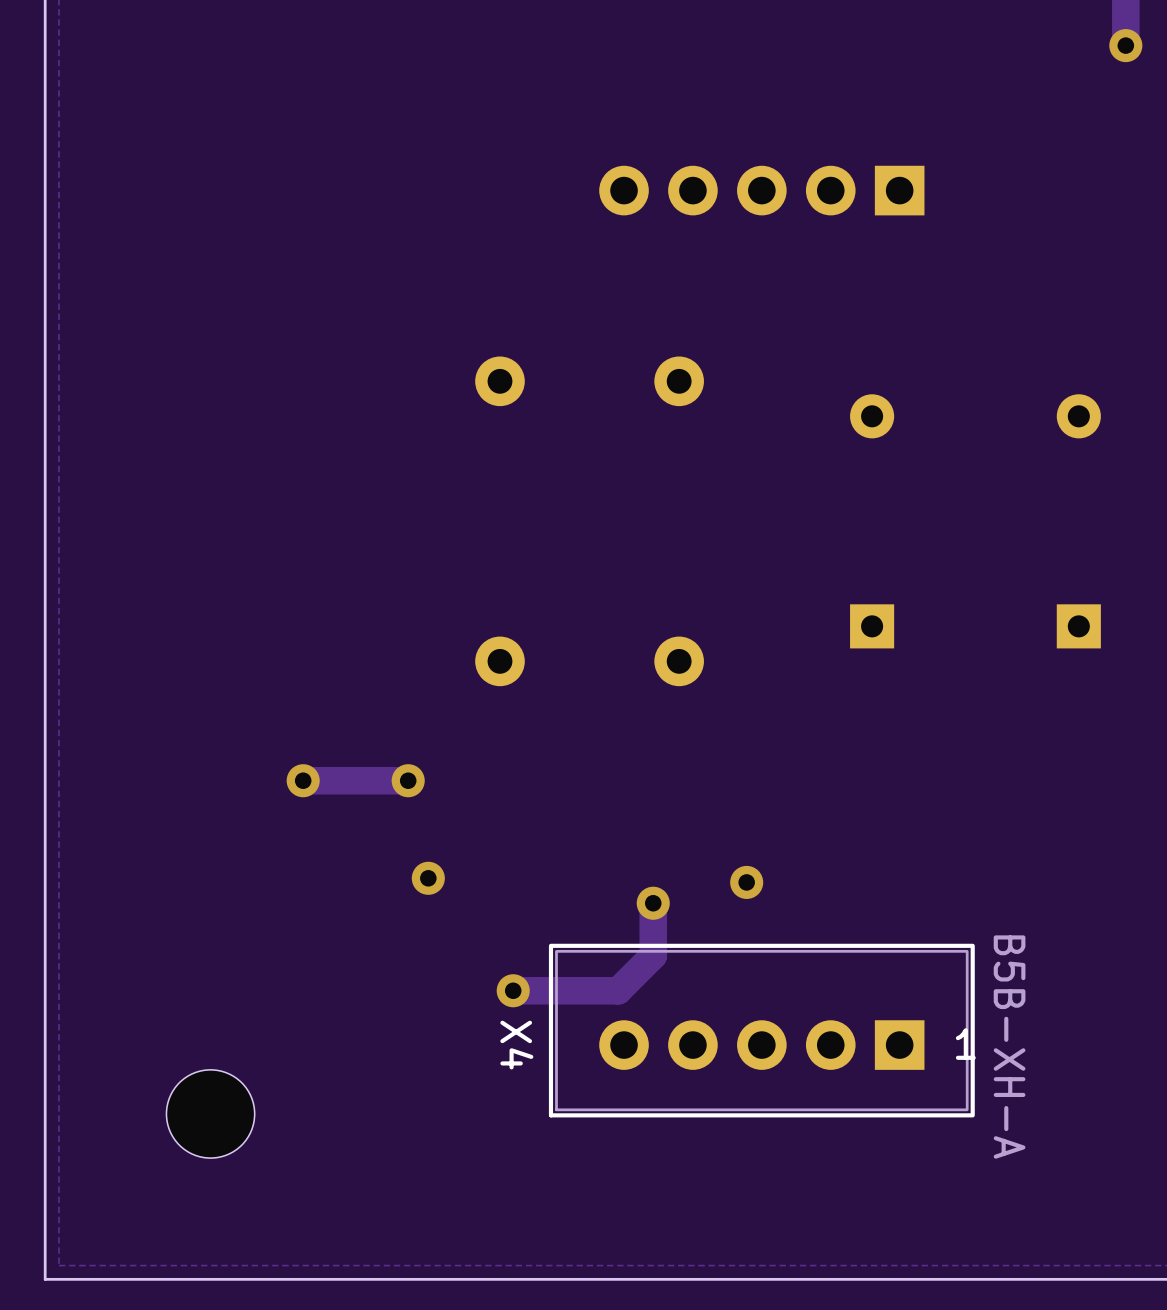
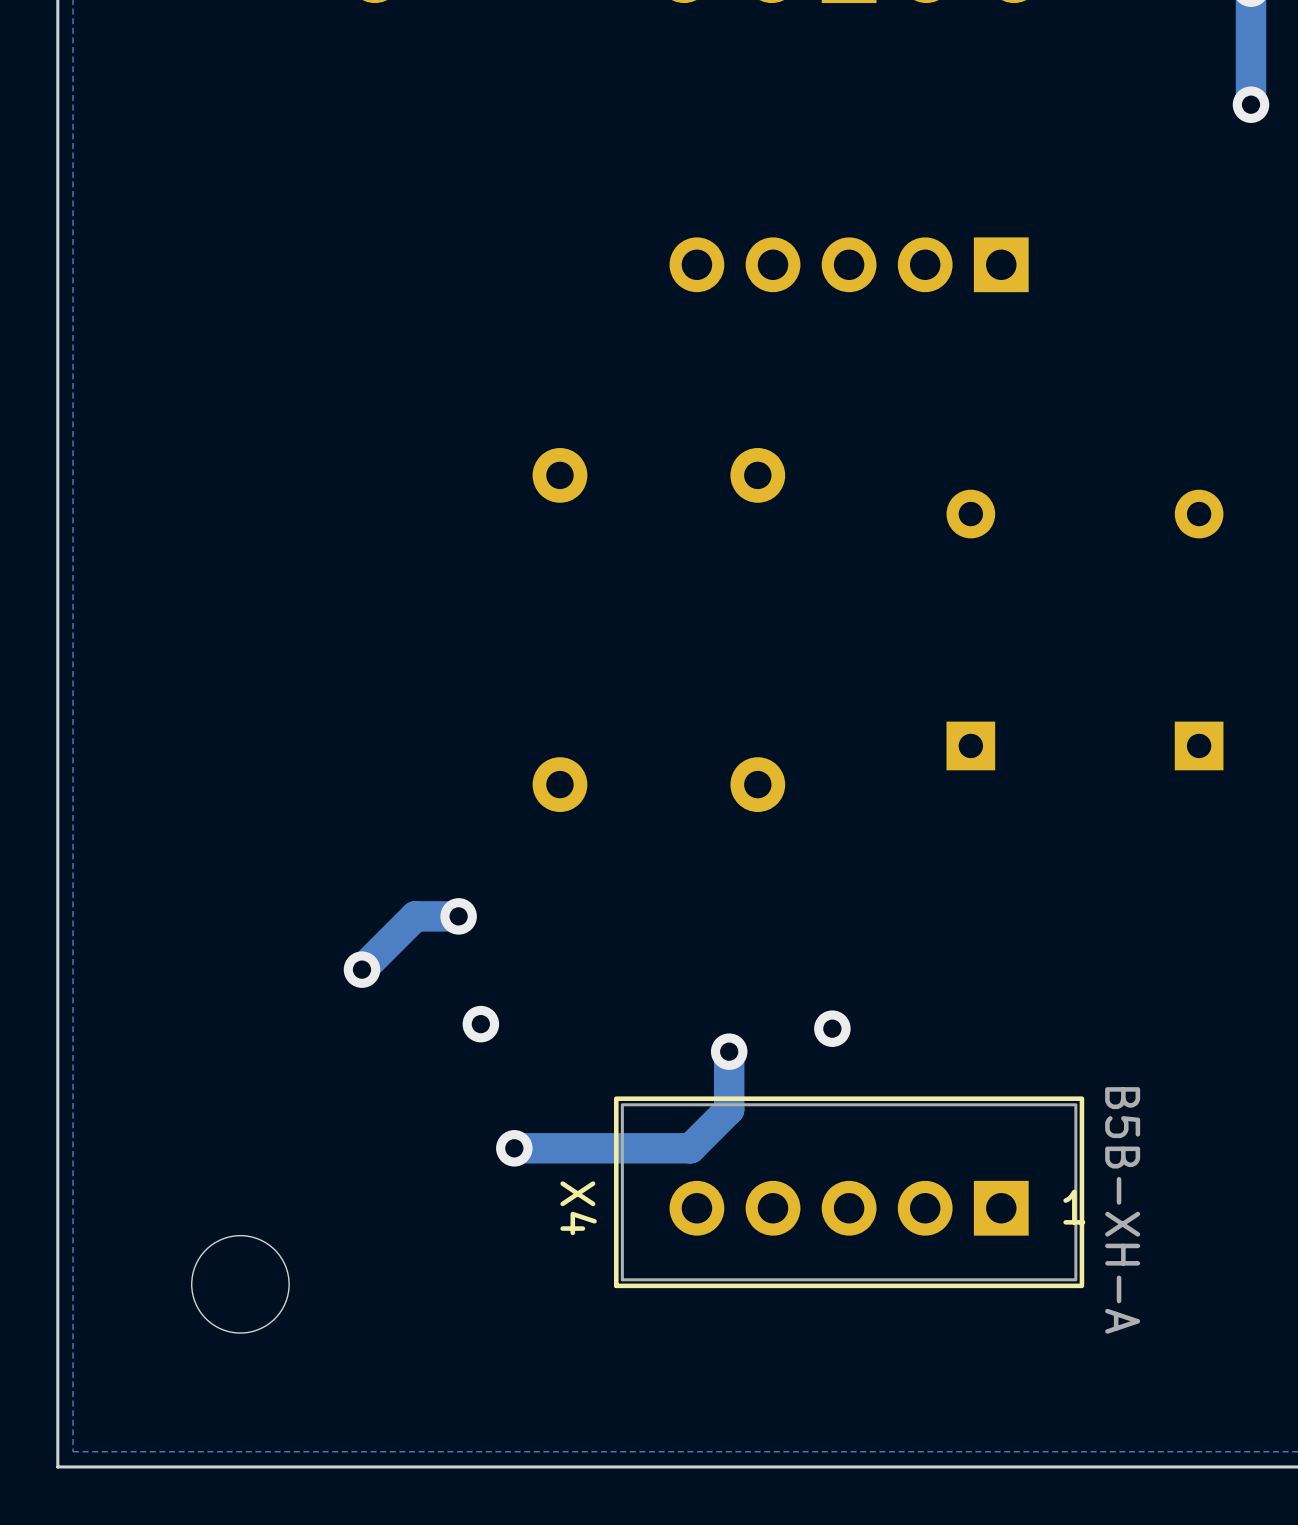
via position: (303, 780) -> (361, 969)
track: (368, 780) (303, 780) -> (415, 916) (361, 969)
track: none -> (574, 1148) (514, 1148)
via position: (513, 990) -> (514, 1148)

